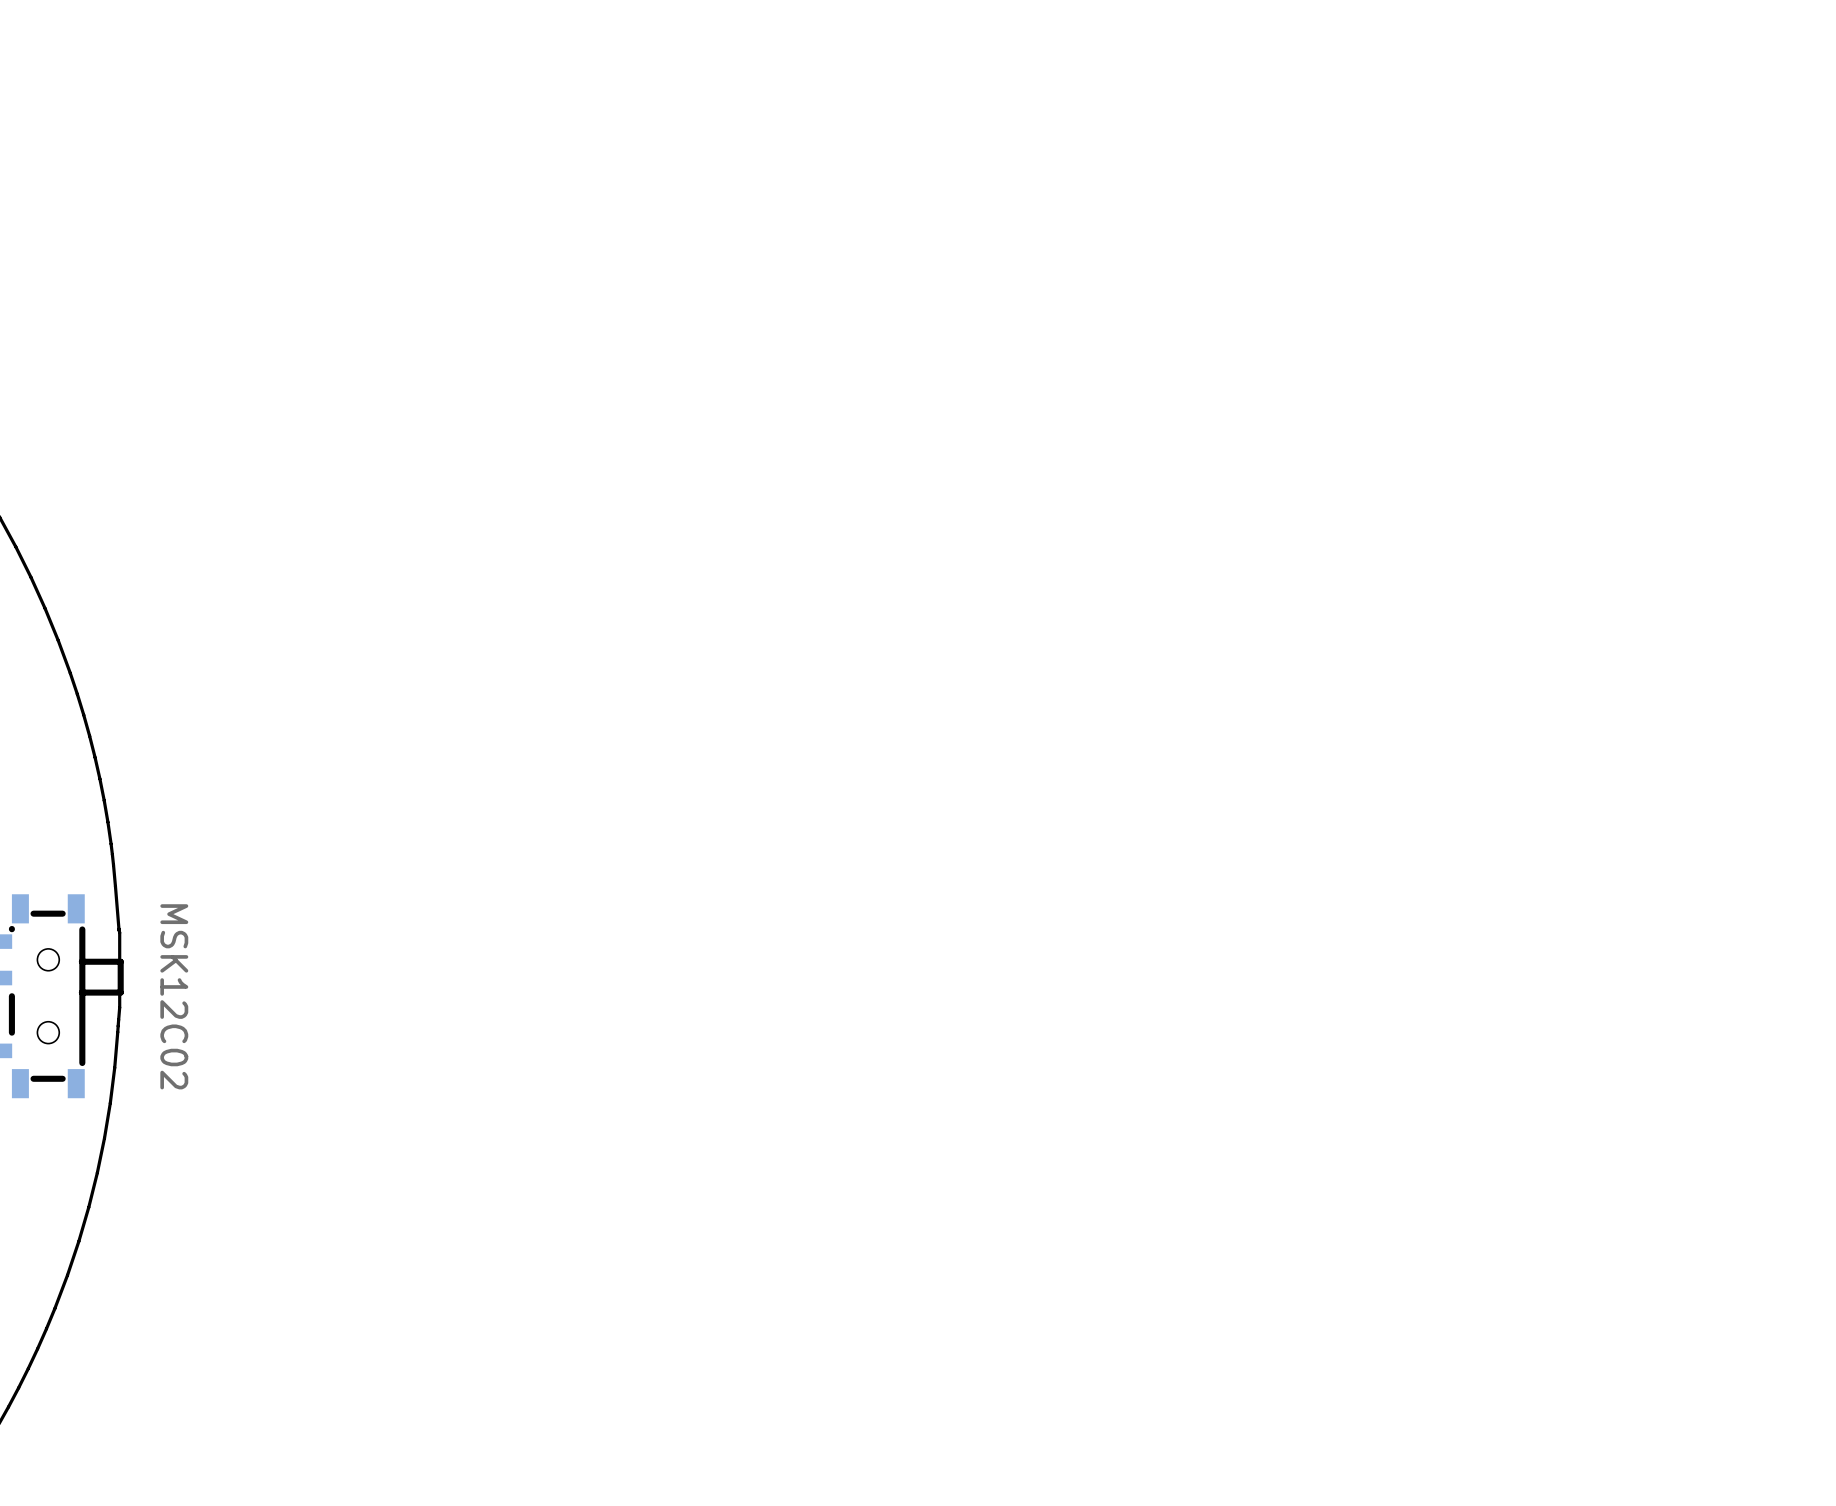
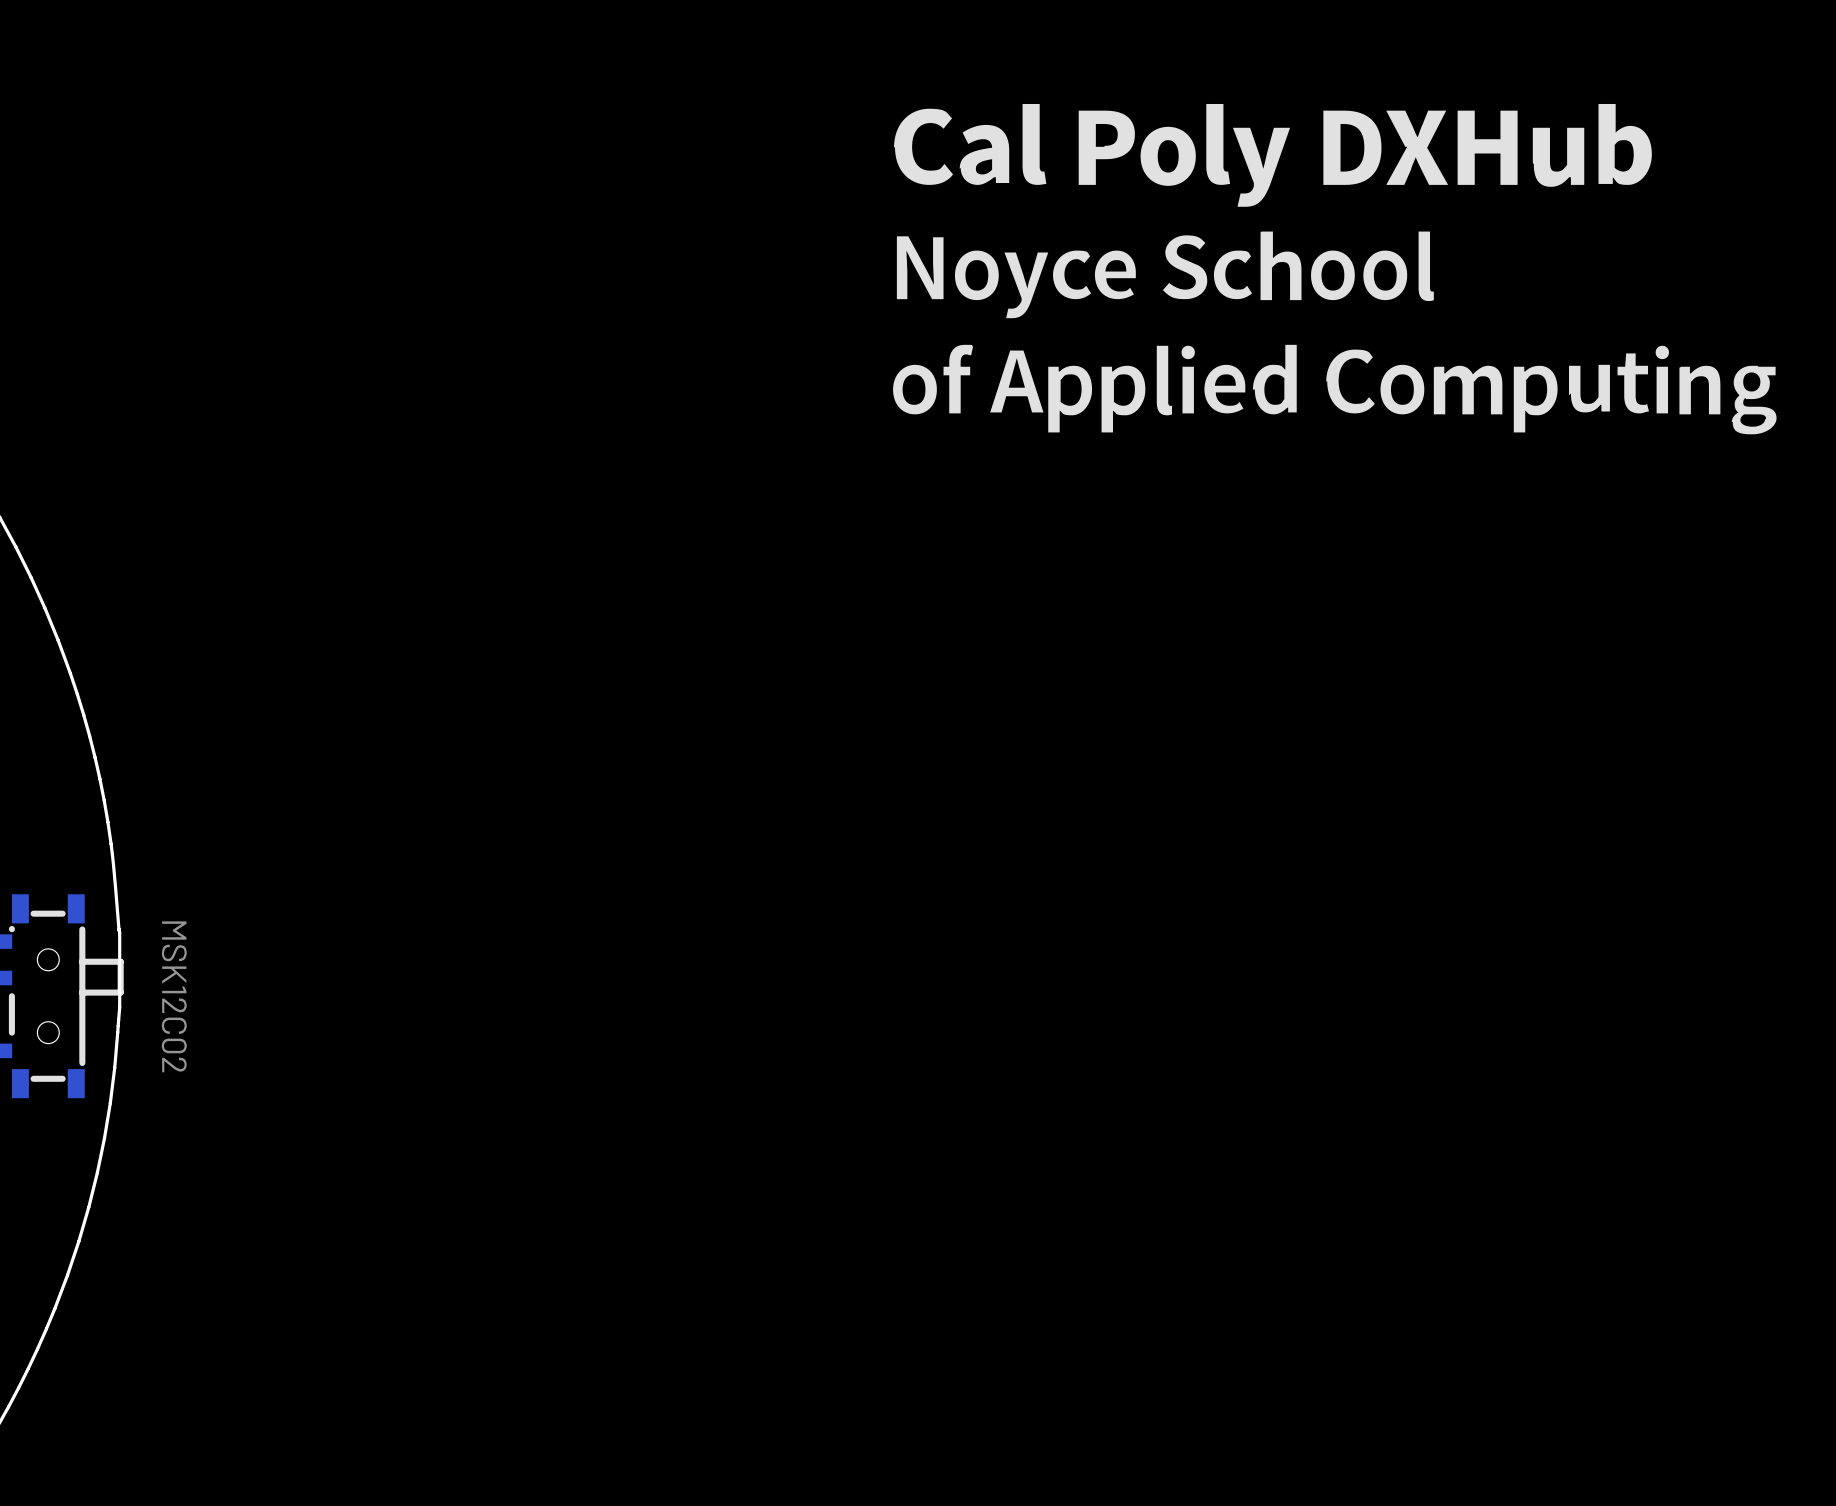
drawing: none -> [894, 103, 1047, 185]
drawing: none -> [896, 103, 1434, 319]
drawing: none -> [1323, 103, 1652, 187]
drawing: none -> [893, 344, 1297, 433]
drawing: none -> [1326, 345, 1777, 435]

